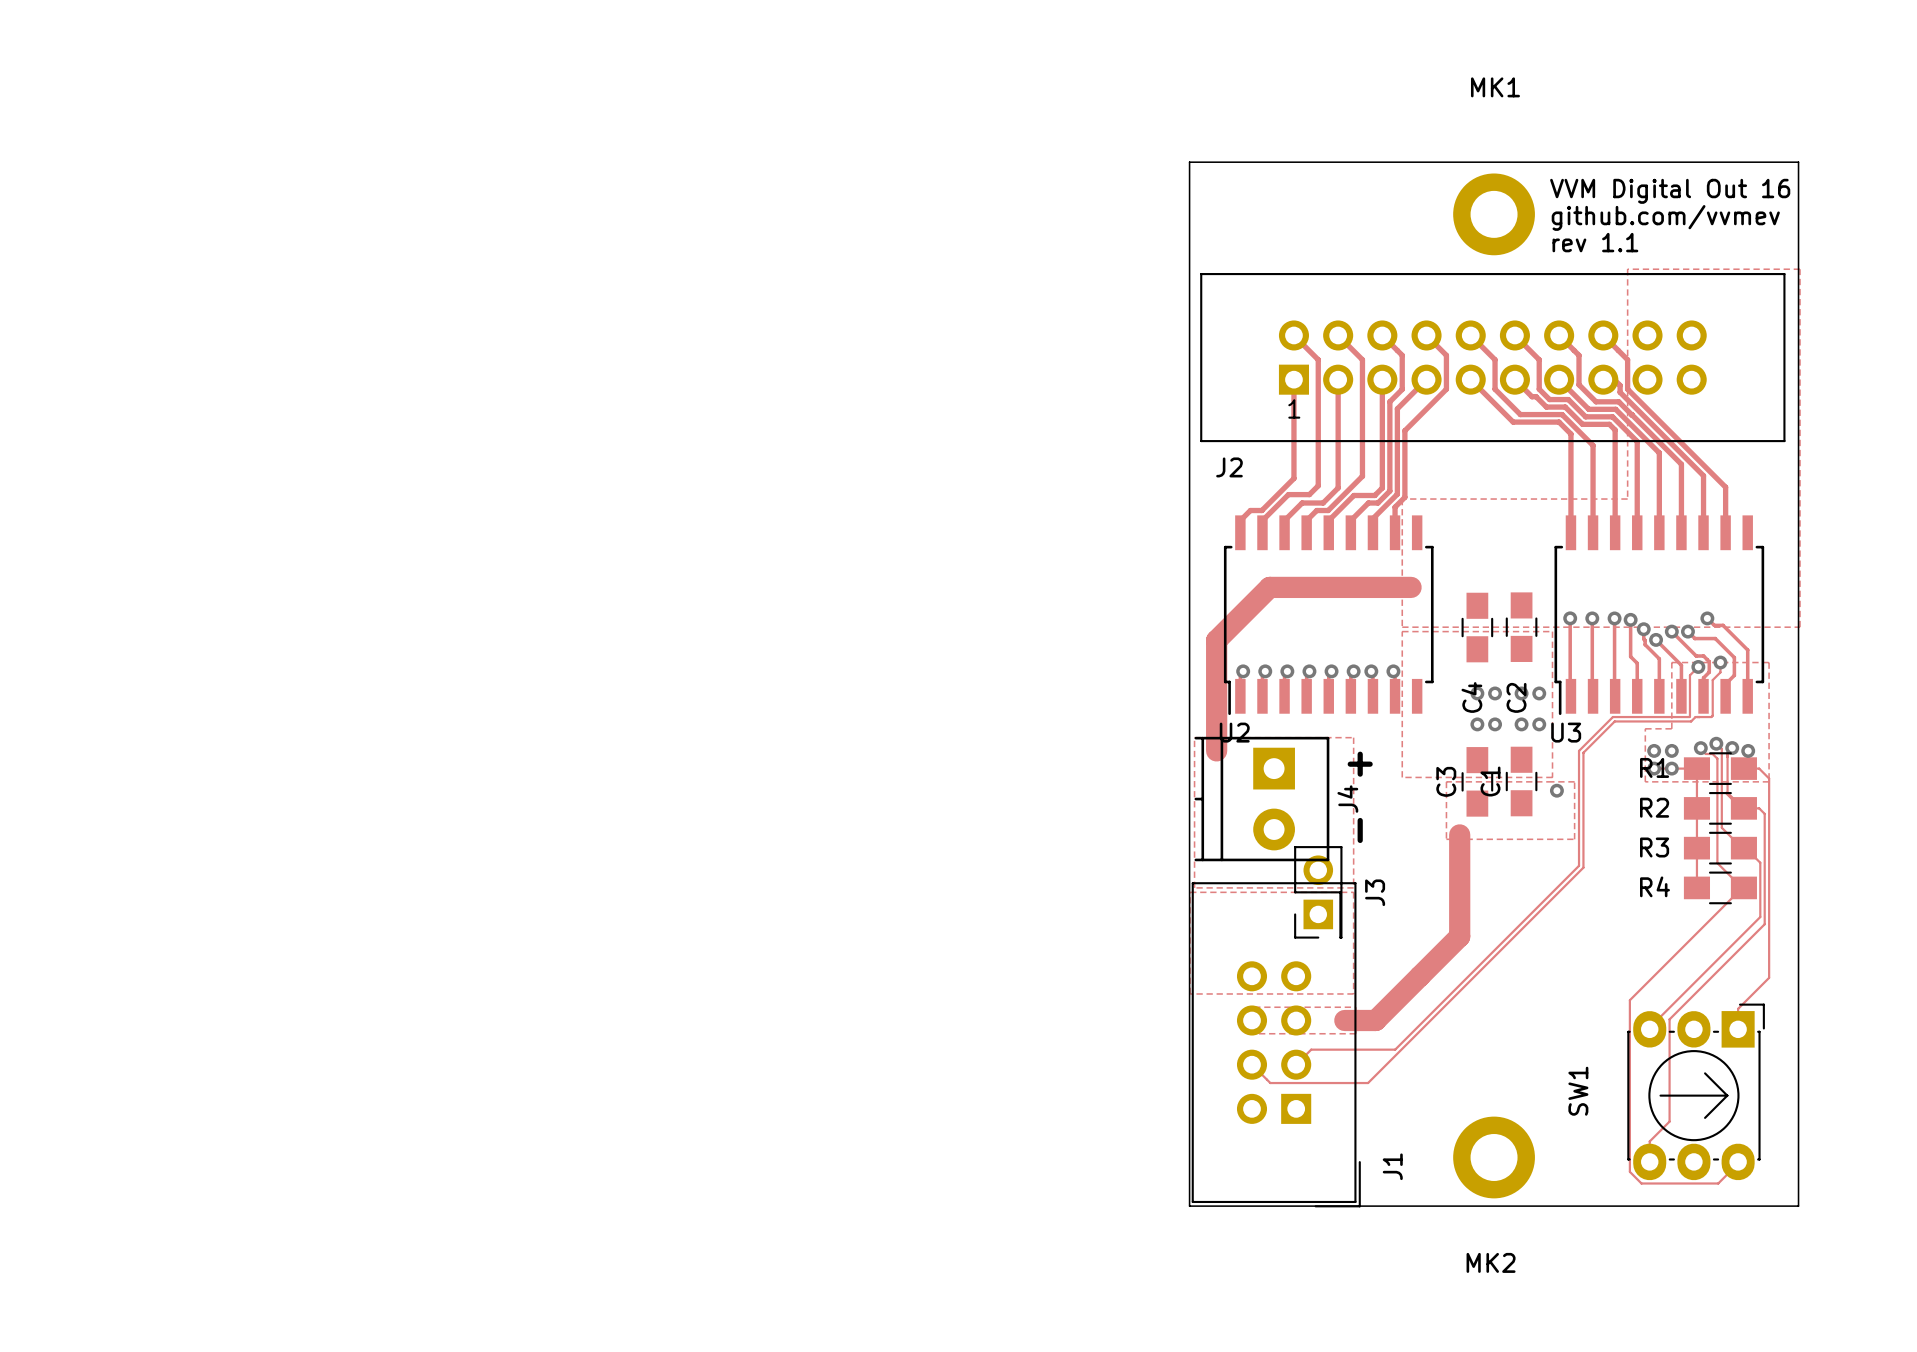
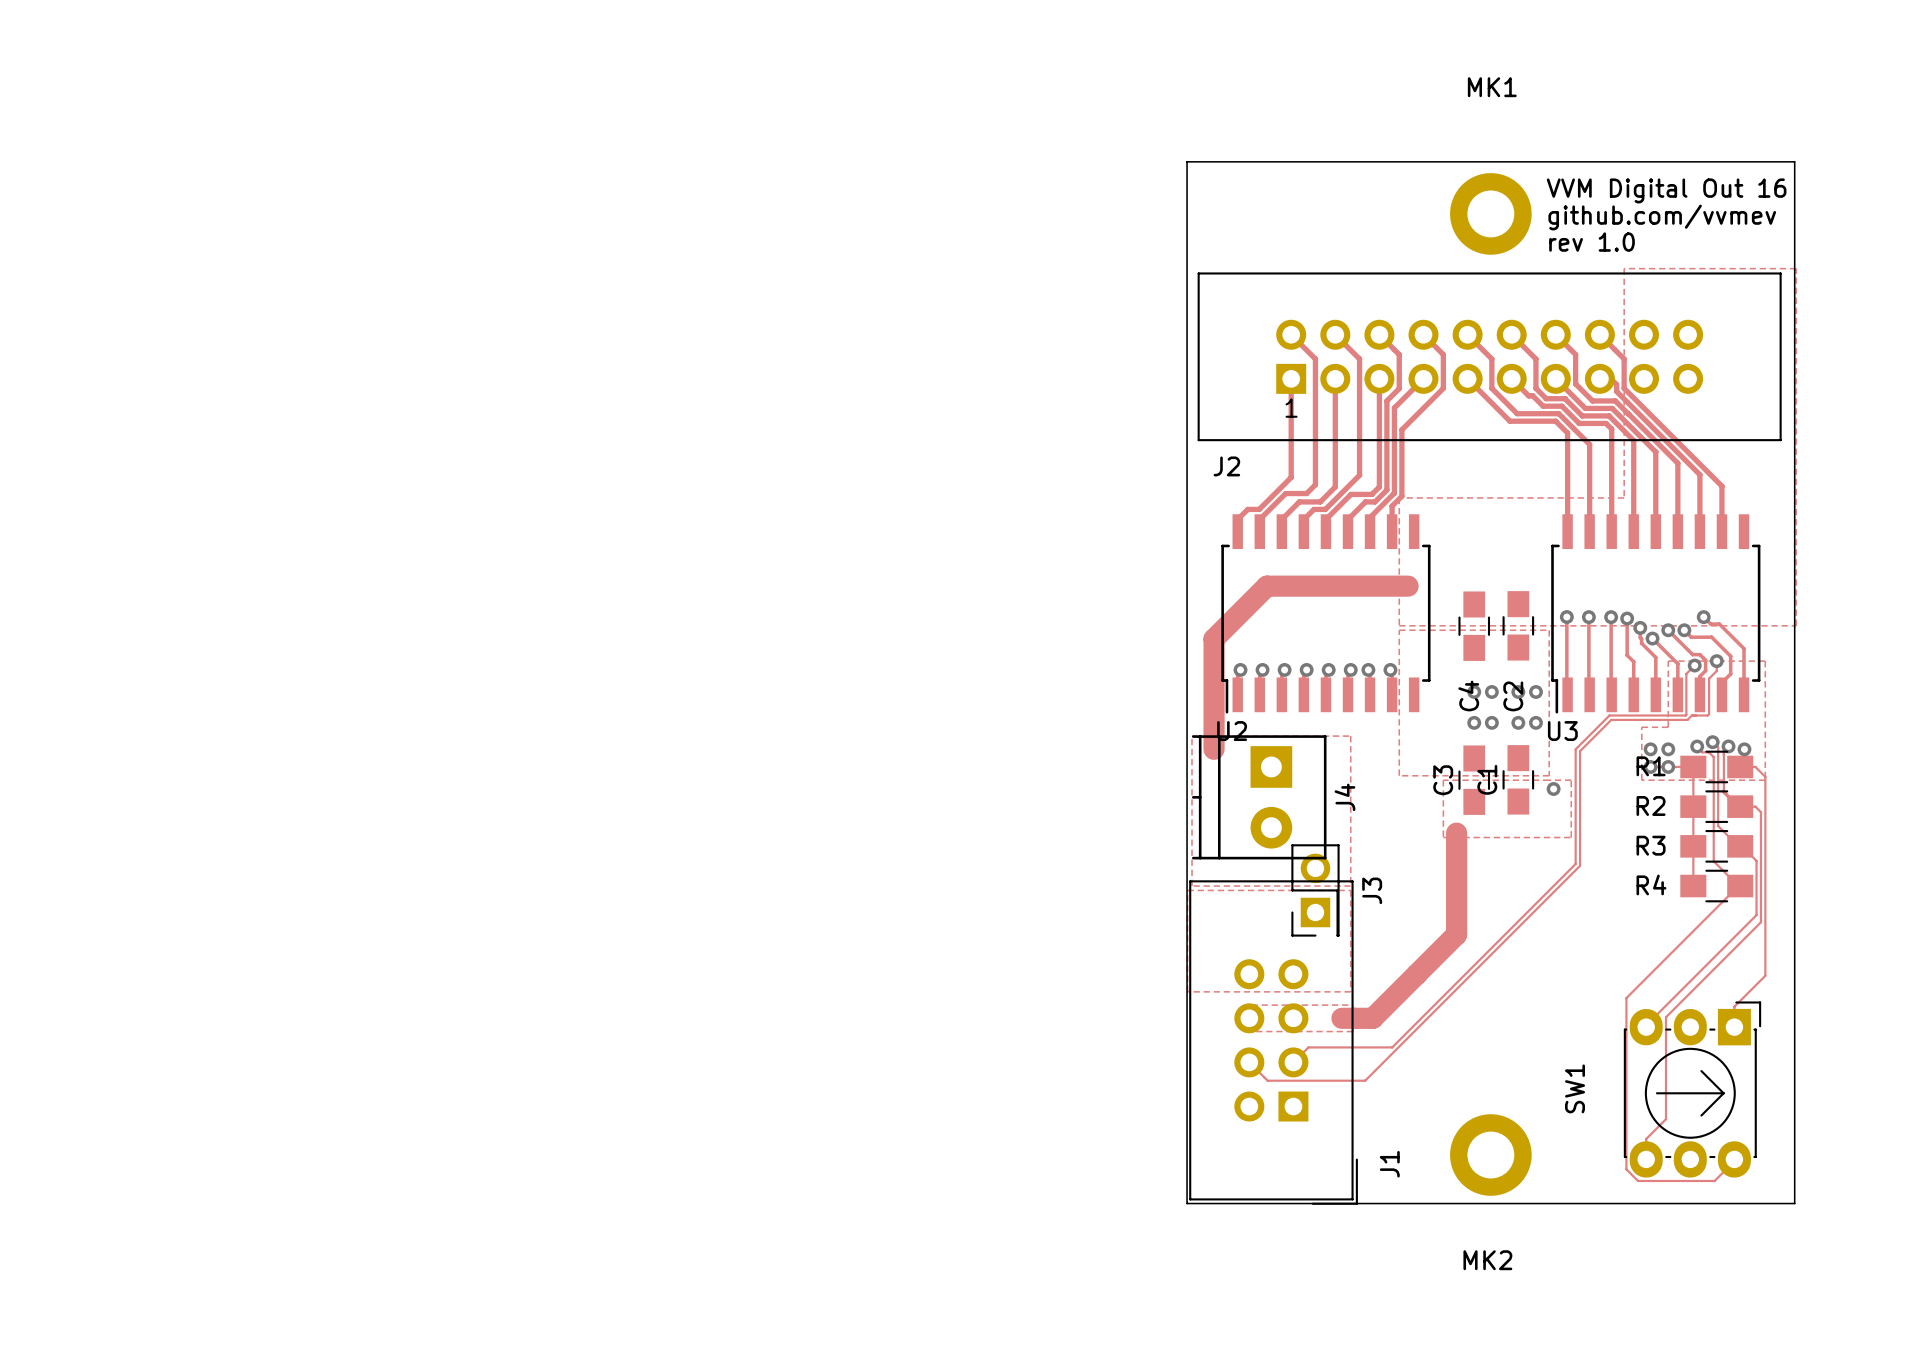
text: rev 1.1 (1595, 242) -> rev 1.0 (1592, 242)
text: + (1360, 764) -> none
text: - (1360, 830) -> none

